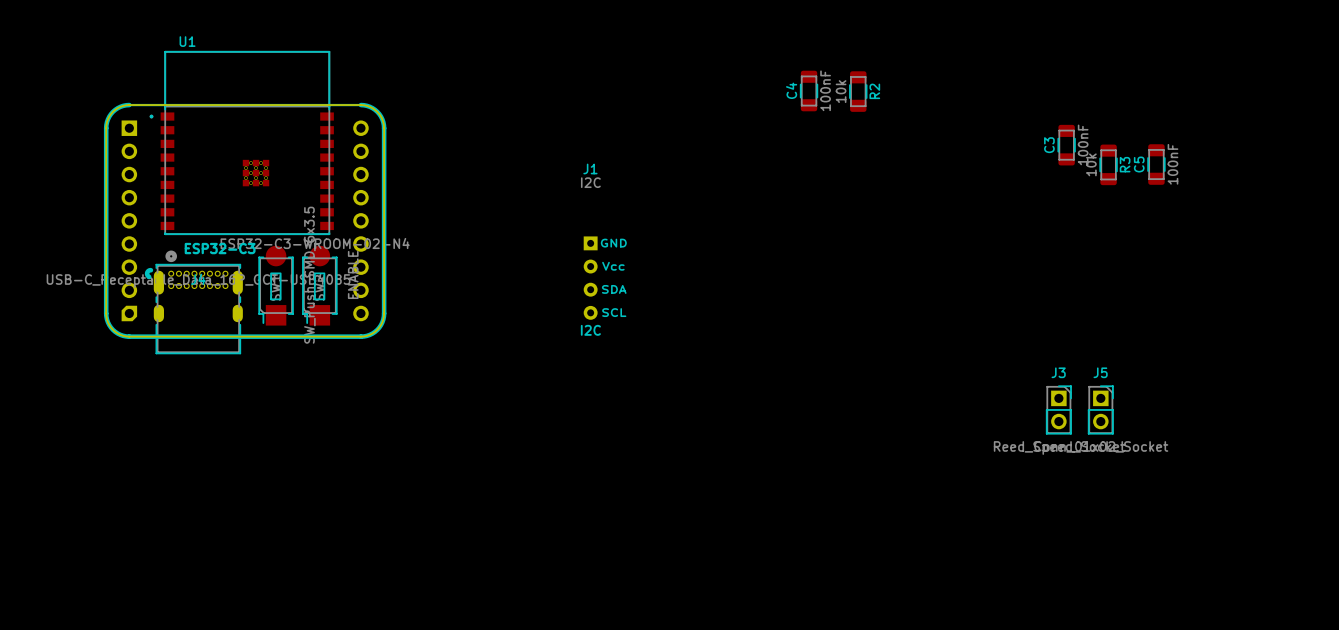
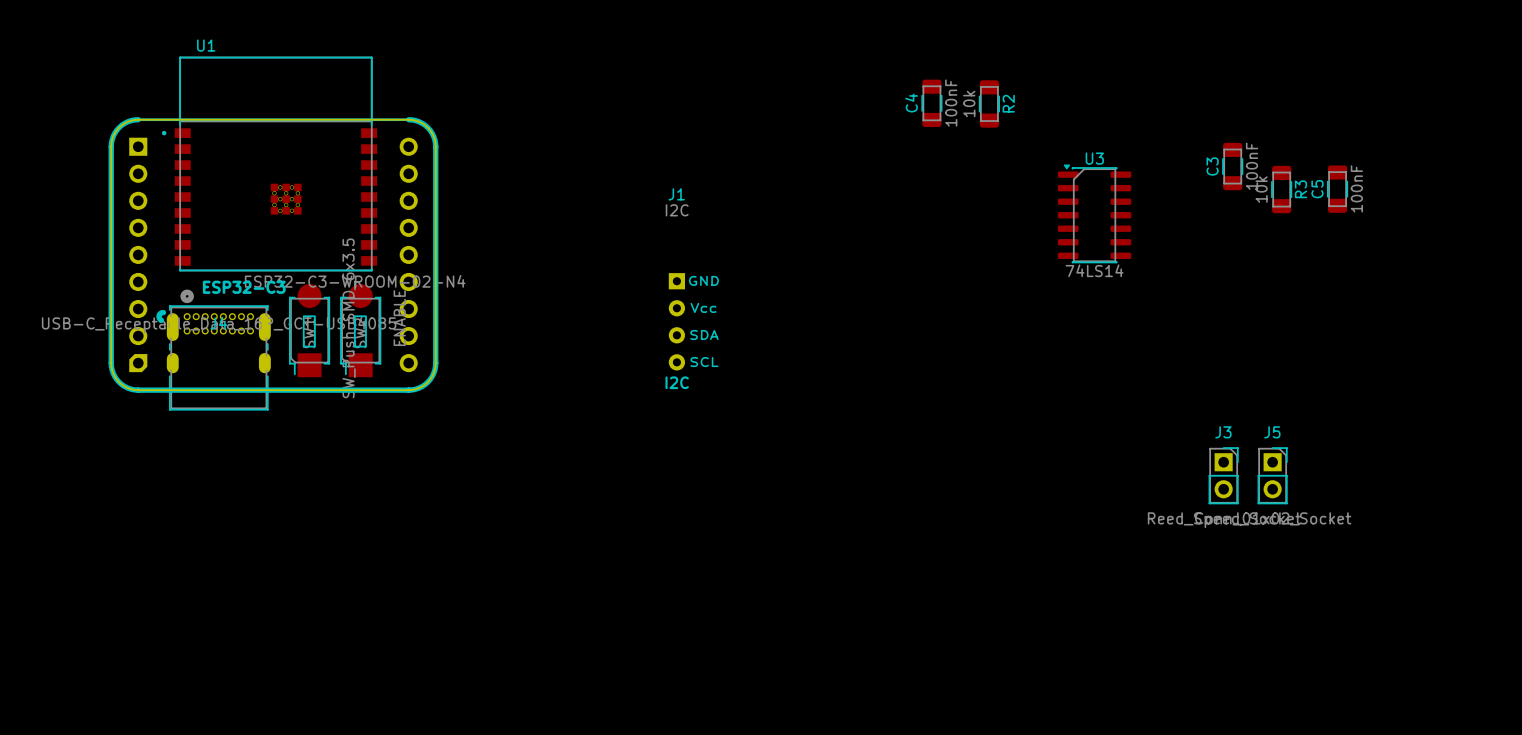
U3: none -> 74LS14 (1094, 213)

